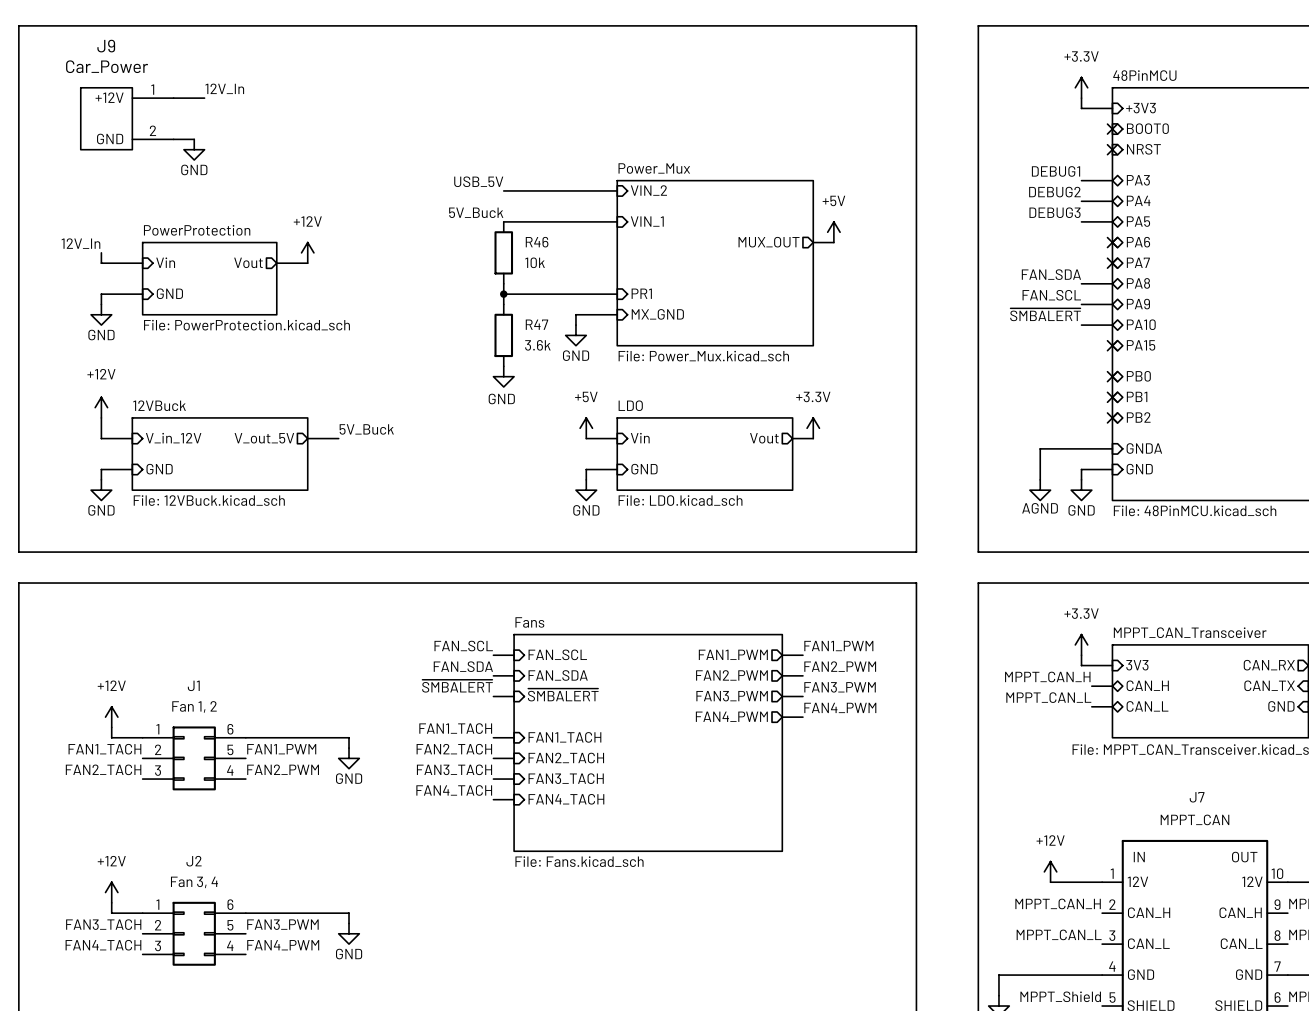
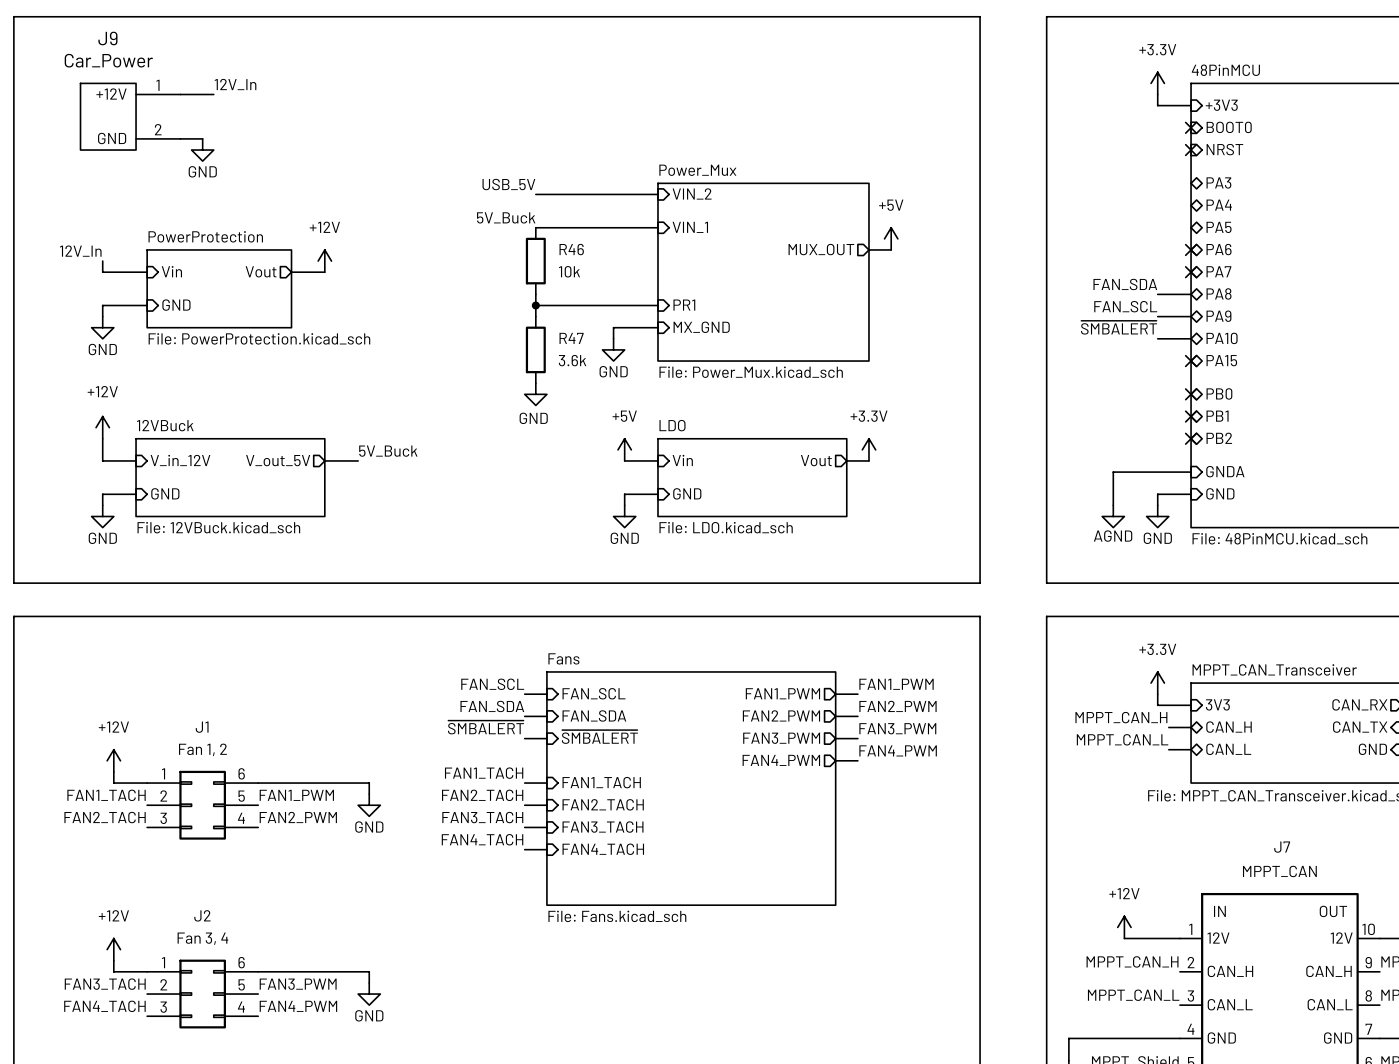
label: DEBUG1 (1056, 171) -> none
wire: (1081, 180) (1112, 180) -> none
label: DEBUG2 (1054, 192) -> none
wire: (1081, 201) (1112, 201) -> none
label: DEBUG3 (1055, 212) -> none
wire: (1081, 221) (1112, 221) -> none

